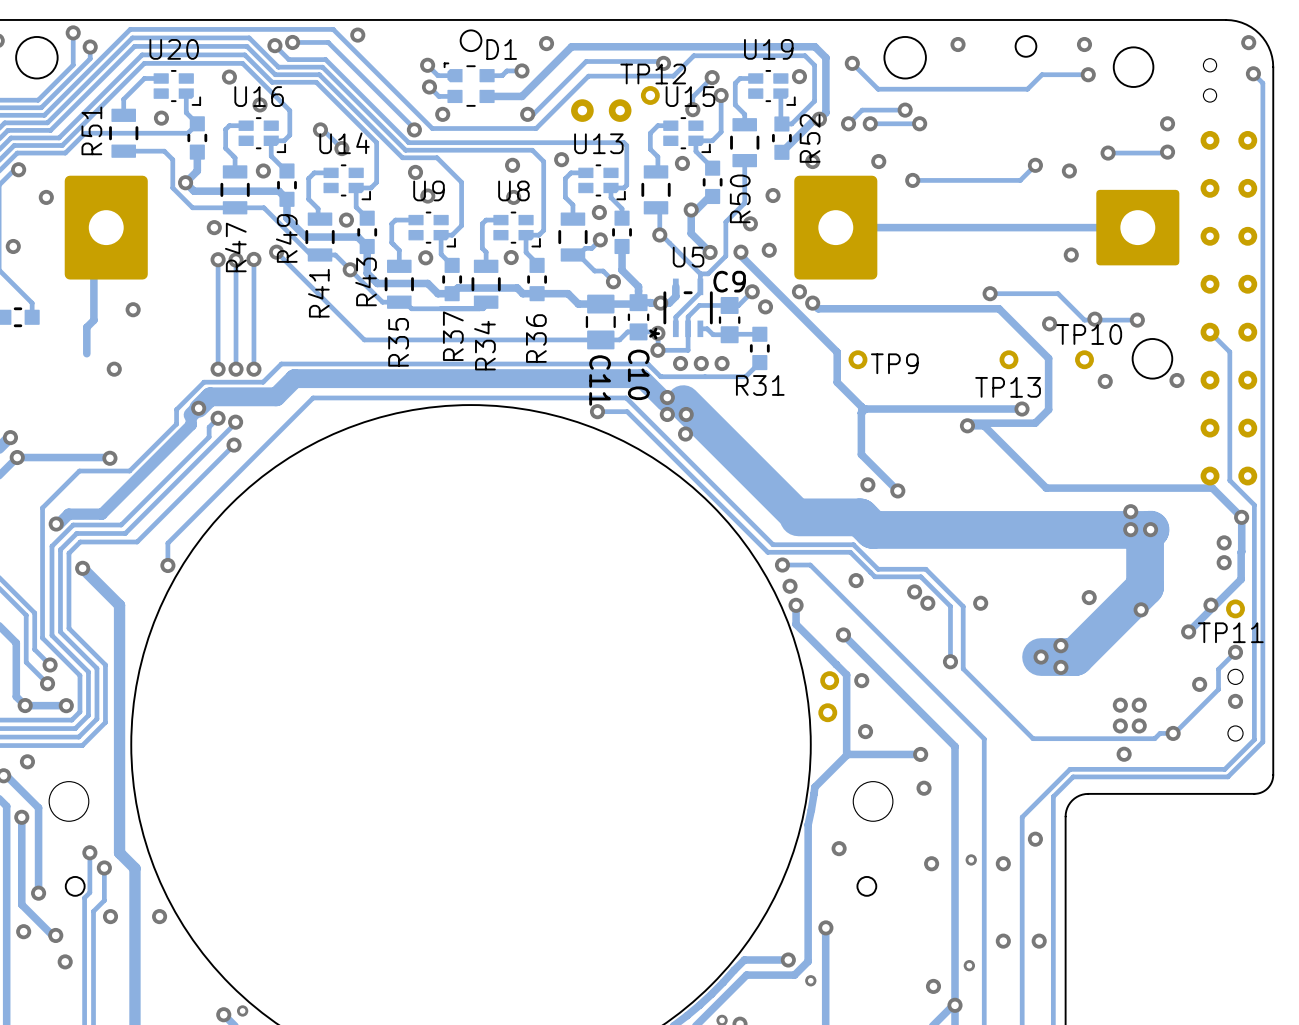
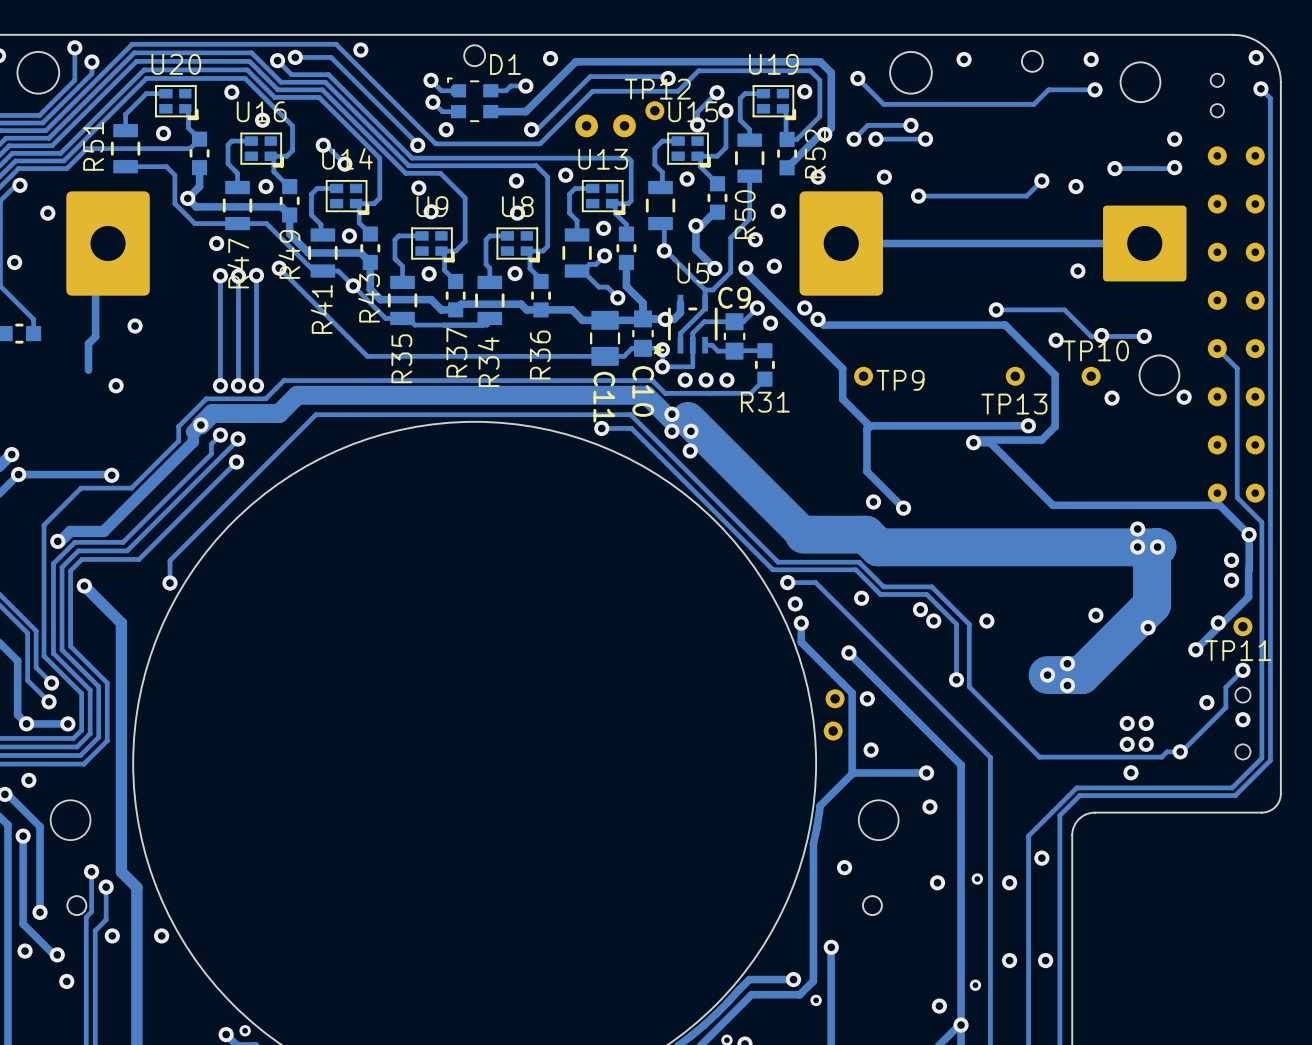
U20 footprint: [153, 70, 202, 106] -> [154, 85, 199, 121]
U19 footprint: [748, 70, 796, 106] -> [752, 85, 797, 121]
U16 footprint: [238, 117, 287, 154] -> [240, 132, 284, 168]
U15 footprint: [663, 117, 711, 154] -> [667, 132, 711, 168]
U14 footprint: [323, 164, 371, 201] -> [325, 179, 370, 216]
U13 footprint: [578, 164, 626, 201] -> [581, 179, 626, 216]
U9 footprint: [408, 211, 456, 248] -> [411, 227, 455, 263]
U8 footprint: [493, 211, 541, 248] -> [496, 227, 541, 263]

